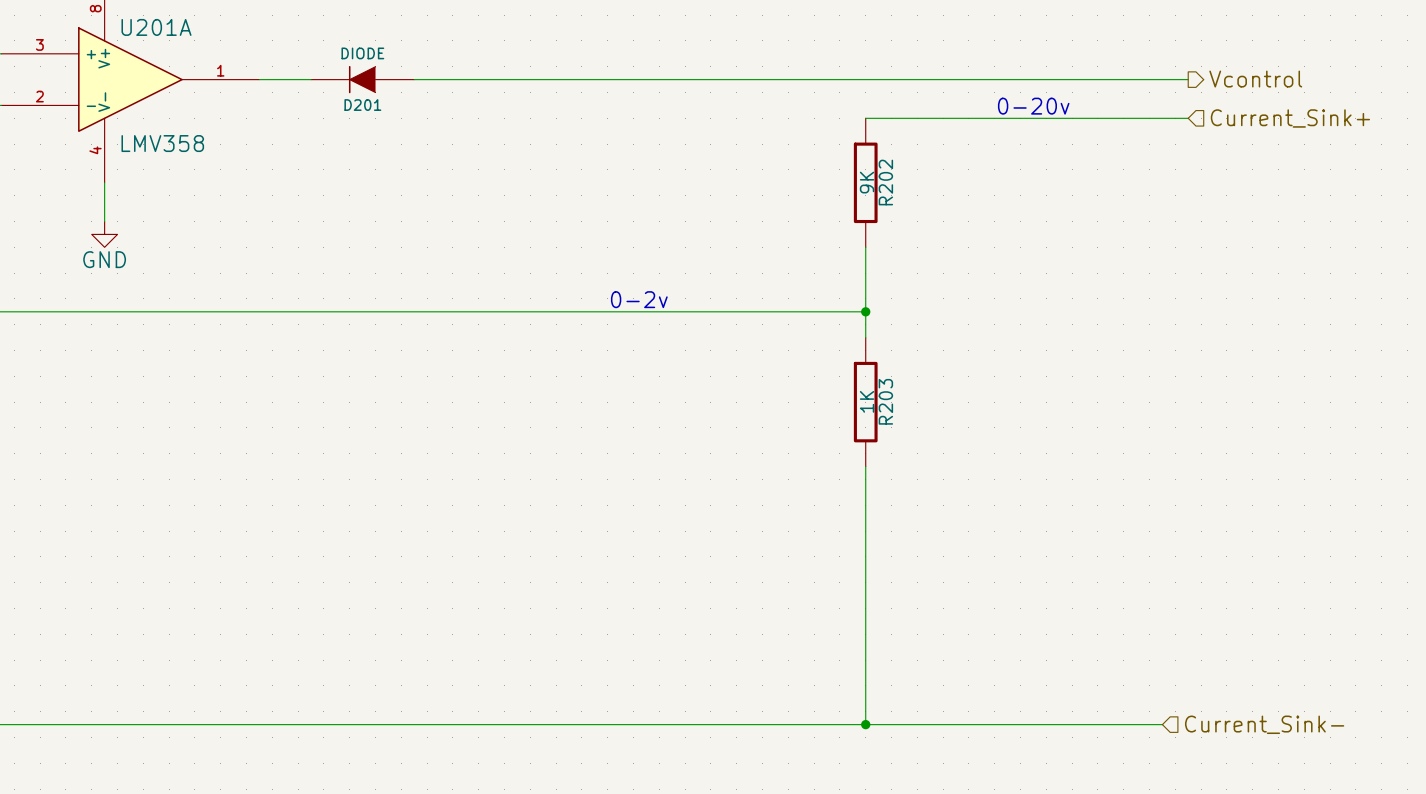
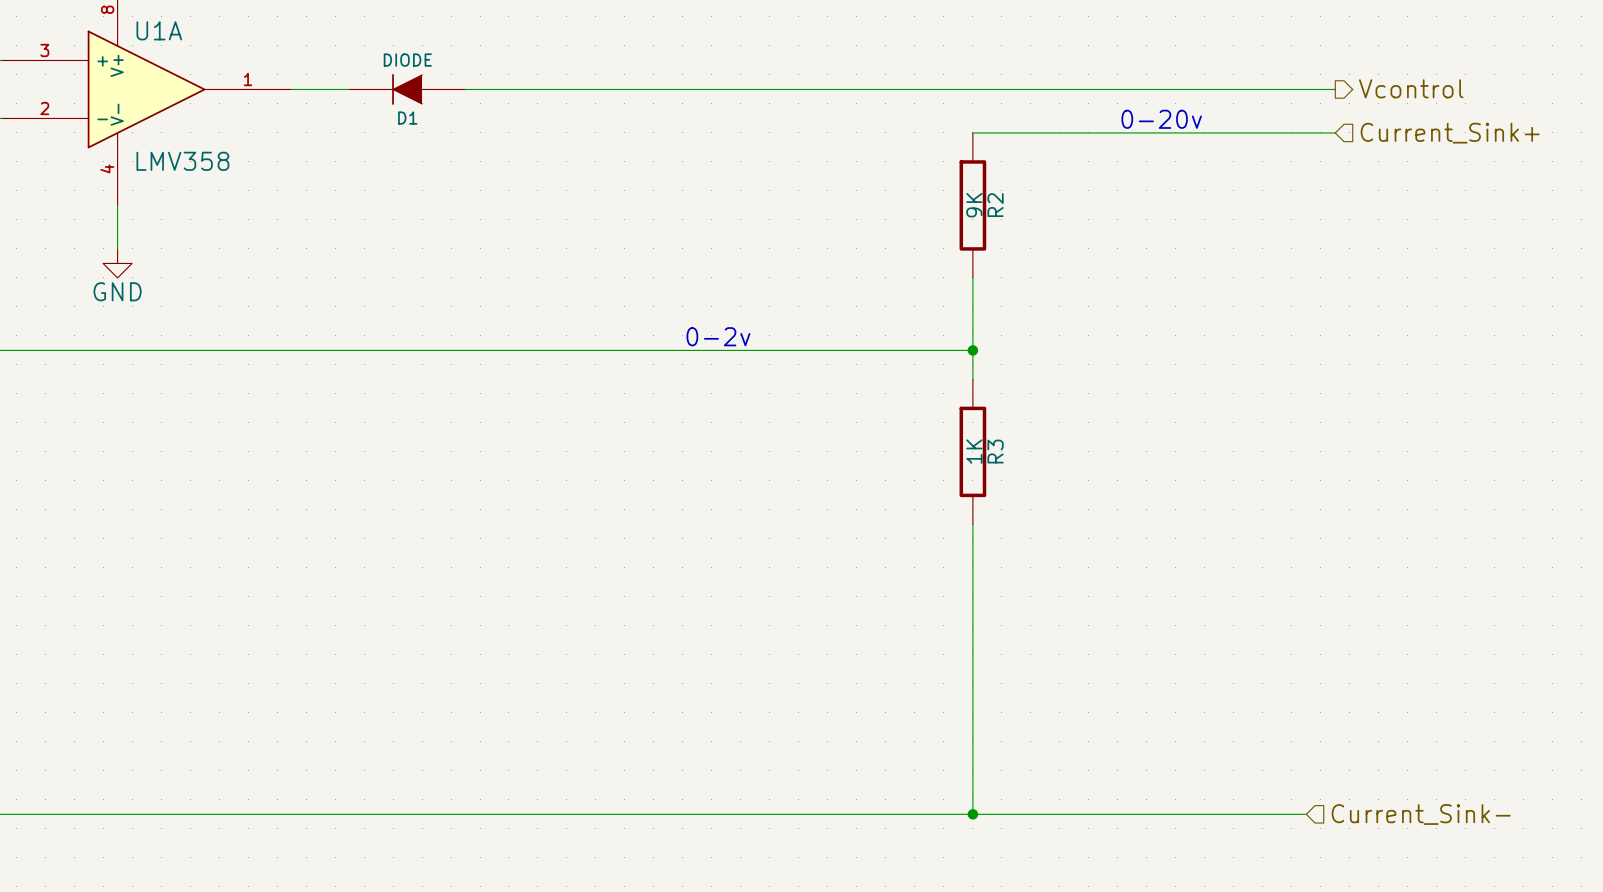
U201A name: U201A (156, 27) -> U1A (159, 30)
D201 name: D201 (362, 105) -> D1 (407, 118)
R202 name: R202 (885, 182) -> R2 (995, 205)
R203 name: R203 (885, 401) -> R3 (995, 451)

